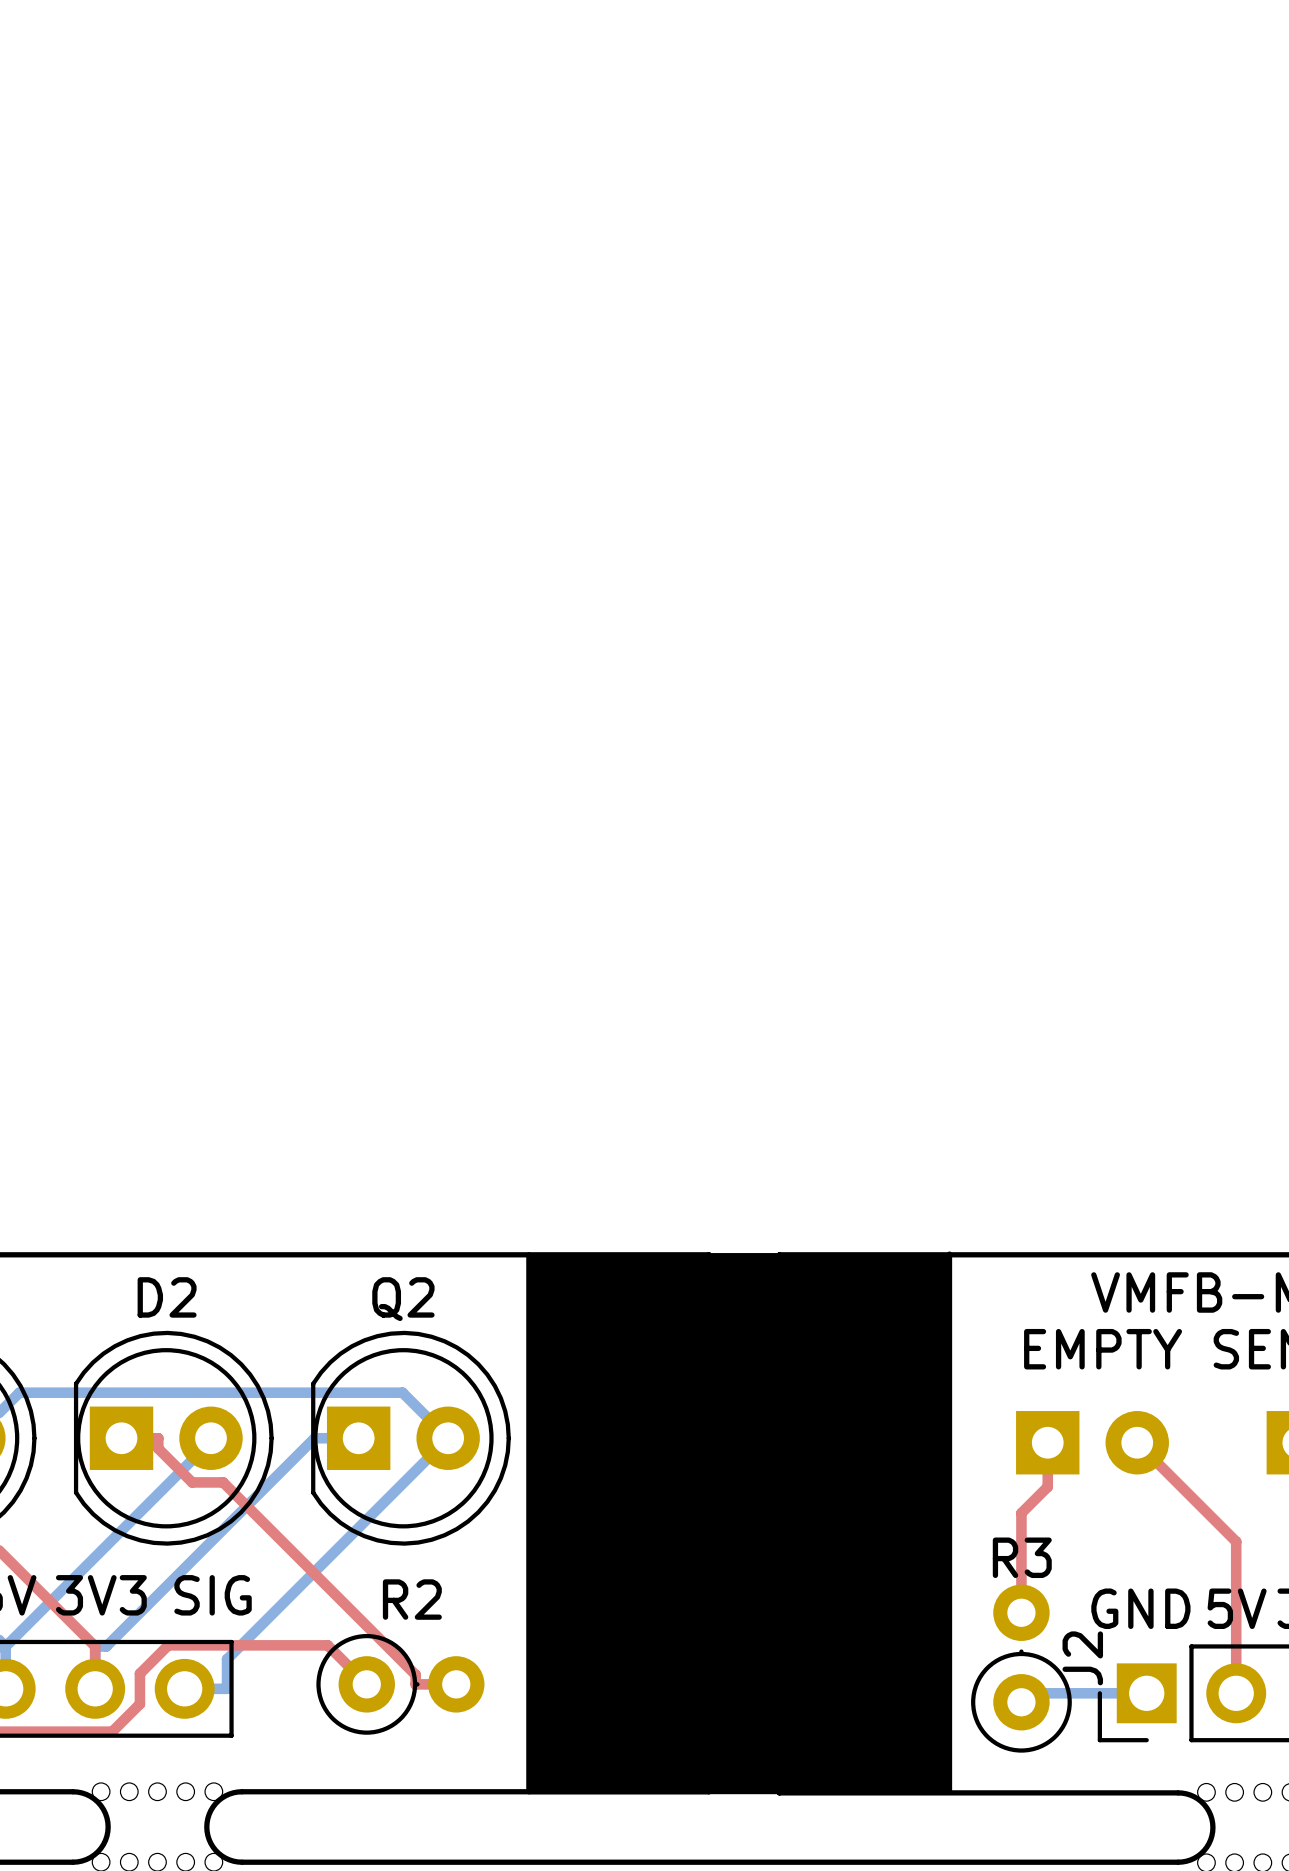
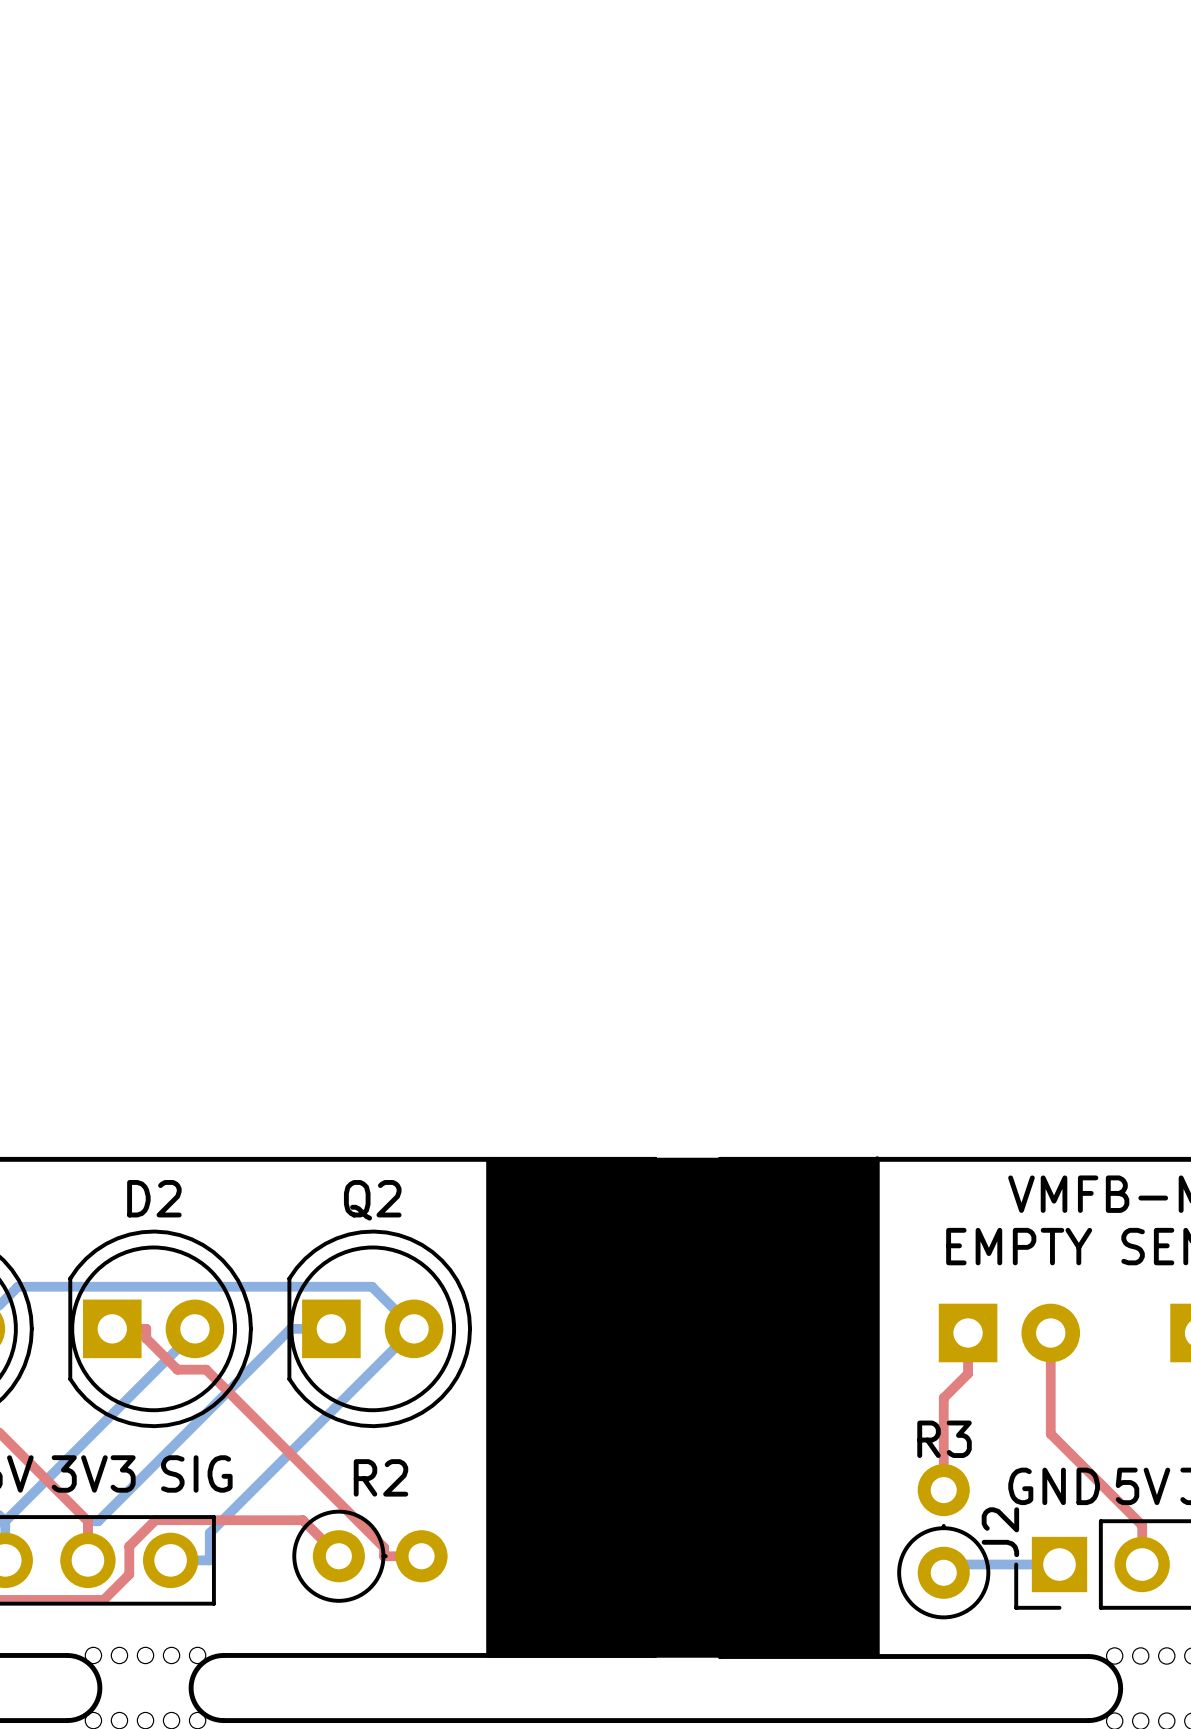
top track: (1137, 1442) (1236, 1541) (1236, 1650) -> (1050, 1332) (1050, 1433) (1142, 1525)

